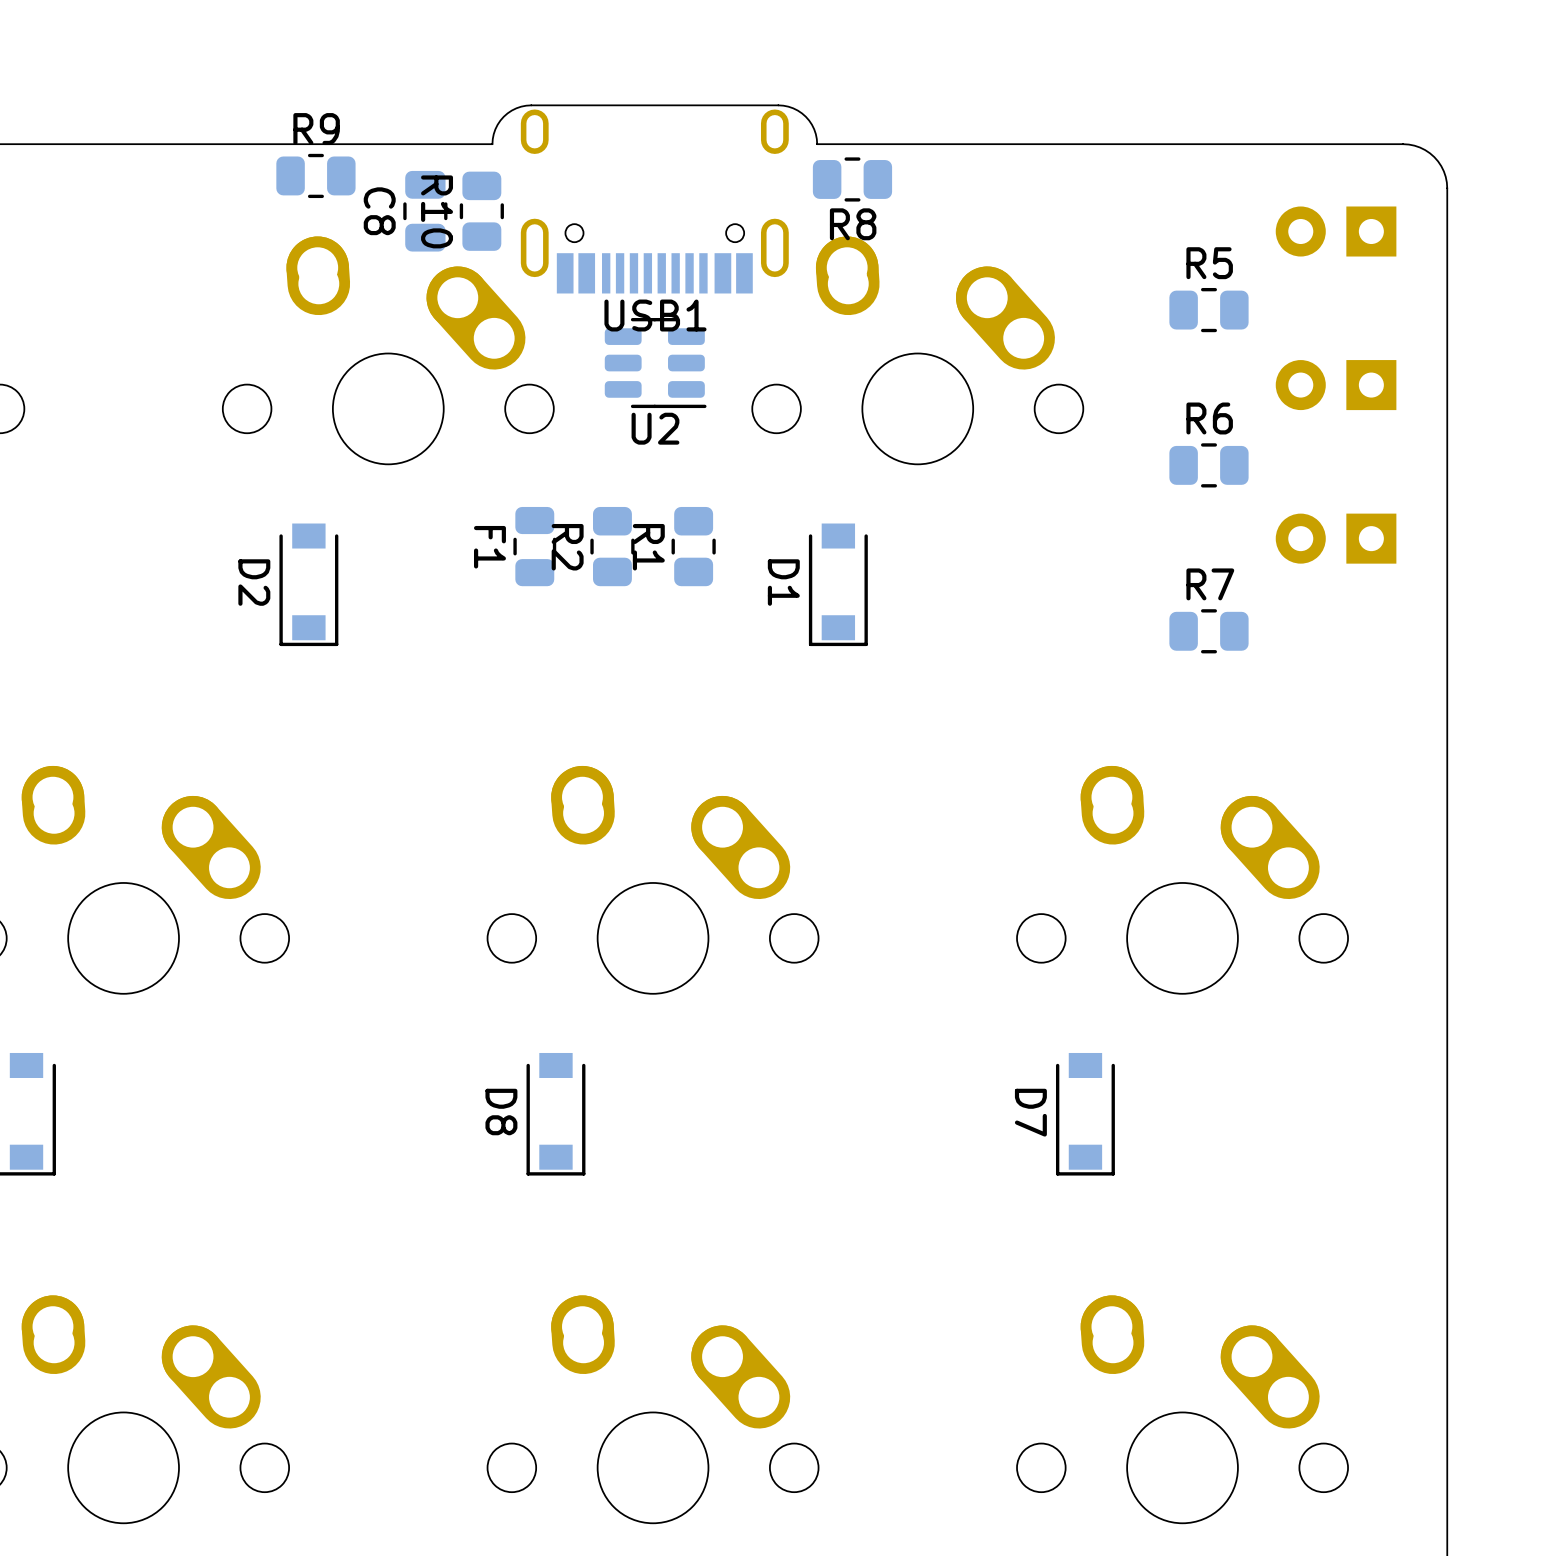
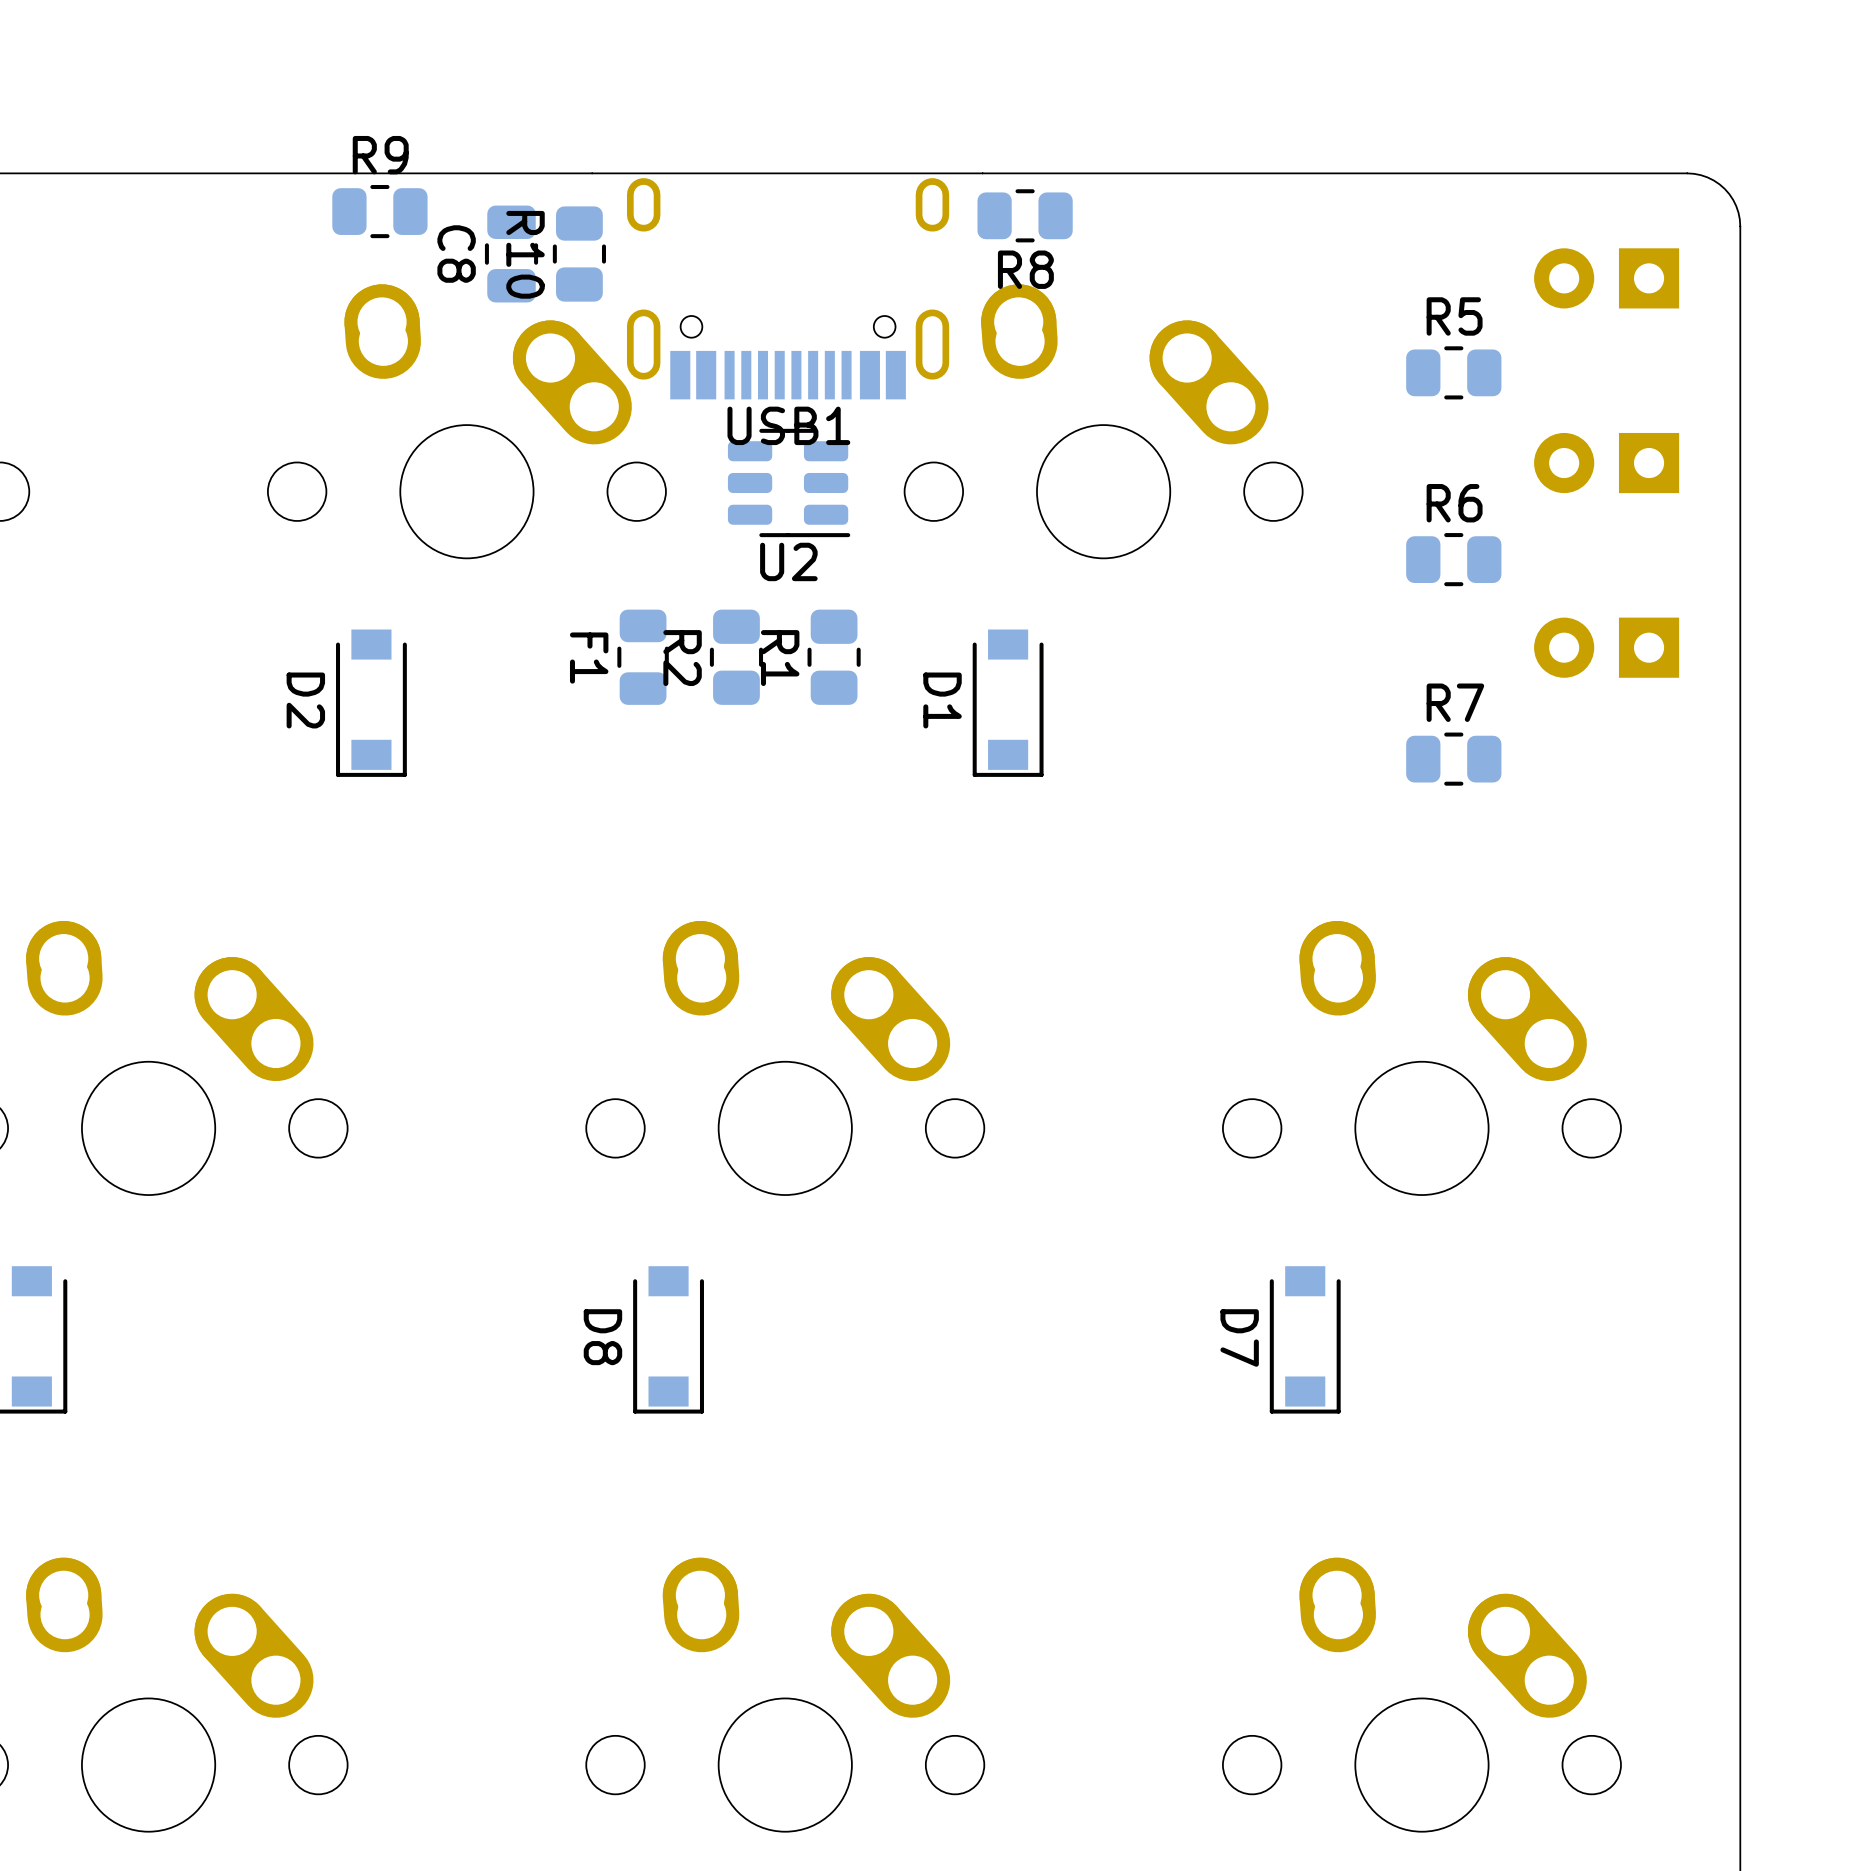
board edge: (817, 144) (814, 129) (805, 116) (793, 108) (778, 105) (526, 105) (511, 110) (500, 120) (495, 129) (492, 144) -> (982, 173) (592, 173)
USB1 position: (654, 201) -> (788, 288)
U2 position: (655, 363) -> (789, 482)

